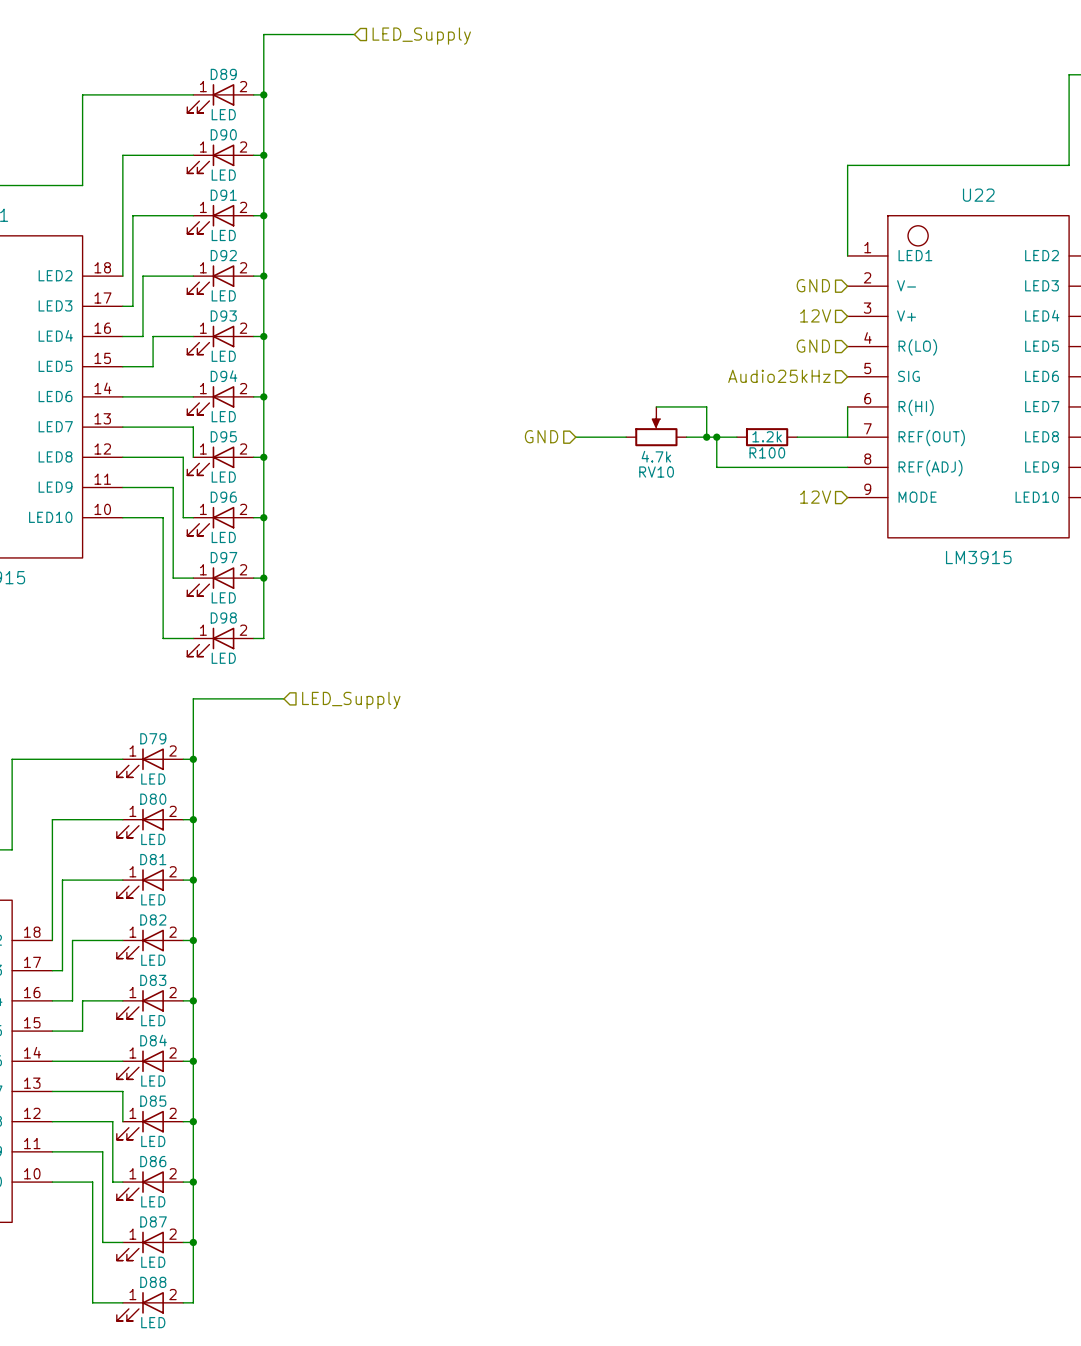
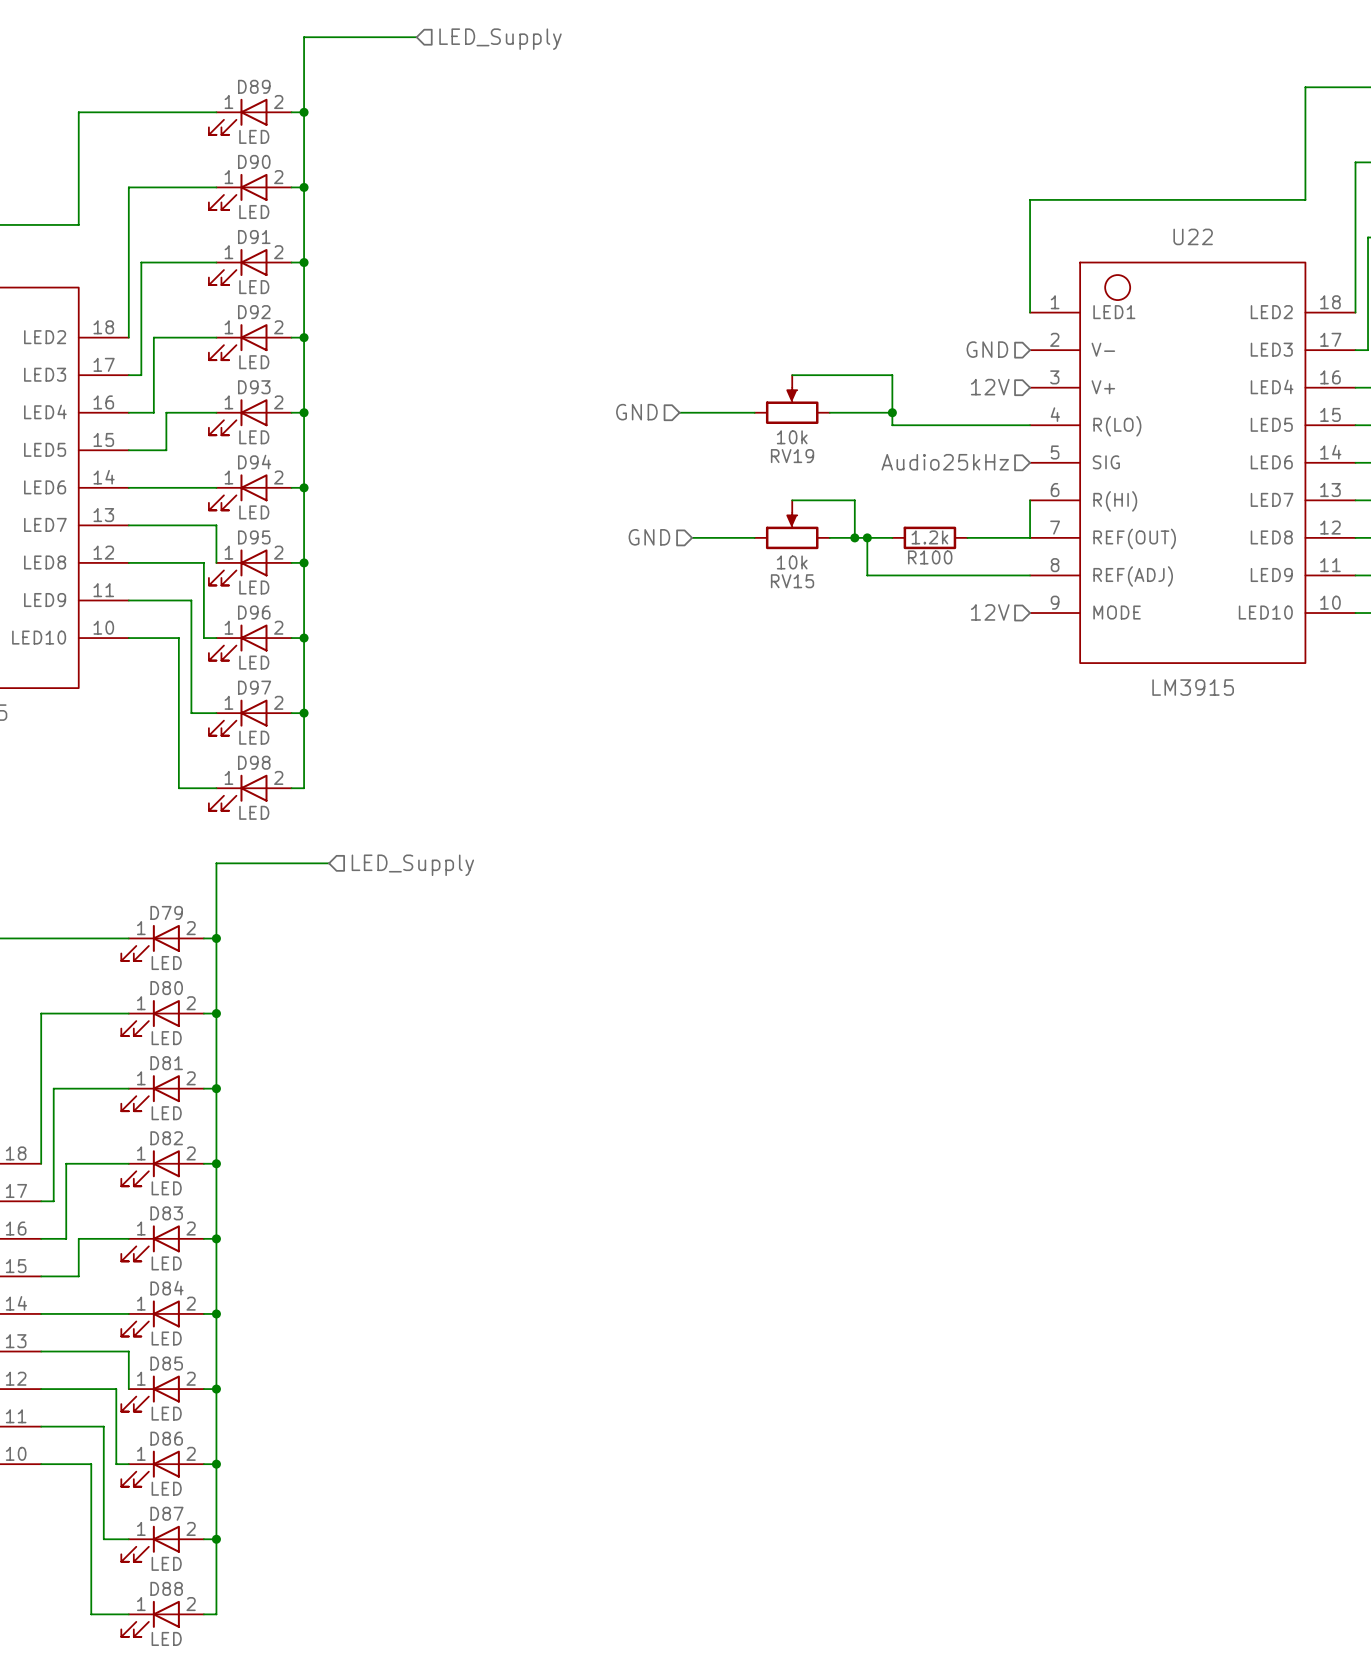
wire: none -> (792, 375) (892, 375) (892, 425) (1030, 425)
RV19: none -> 10k (792, 399)
hierarchical label: none -> GND (636, 412)
wire: none -> (679, 412) (754, 412)
wire: none -> (829, 412) (892, 412)
junction: none -> (892, 412)
hierarchical label: GND (813, 346) -> none
RV10 value: 4.7k (656, 456) -> 10k (792, 562)
RV10 name: RV10 (656, 472) -> RV15 (792, 581)

